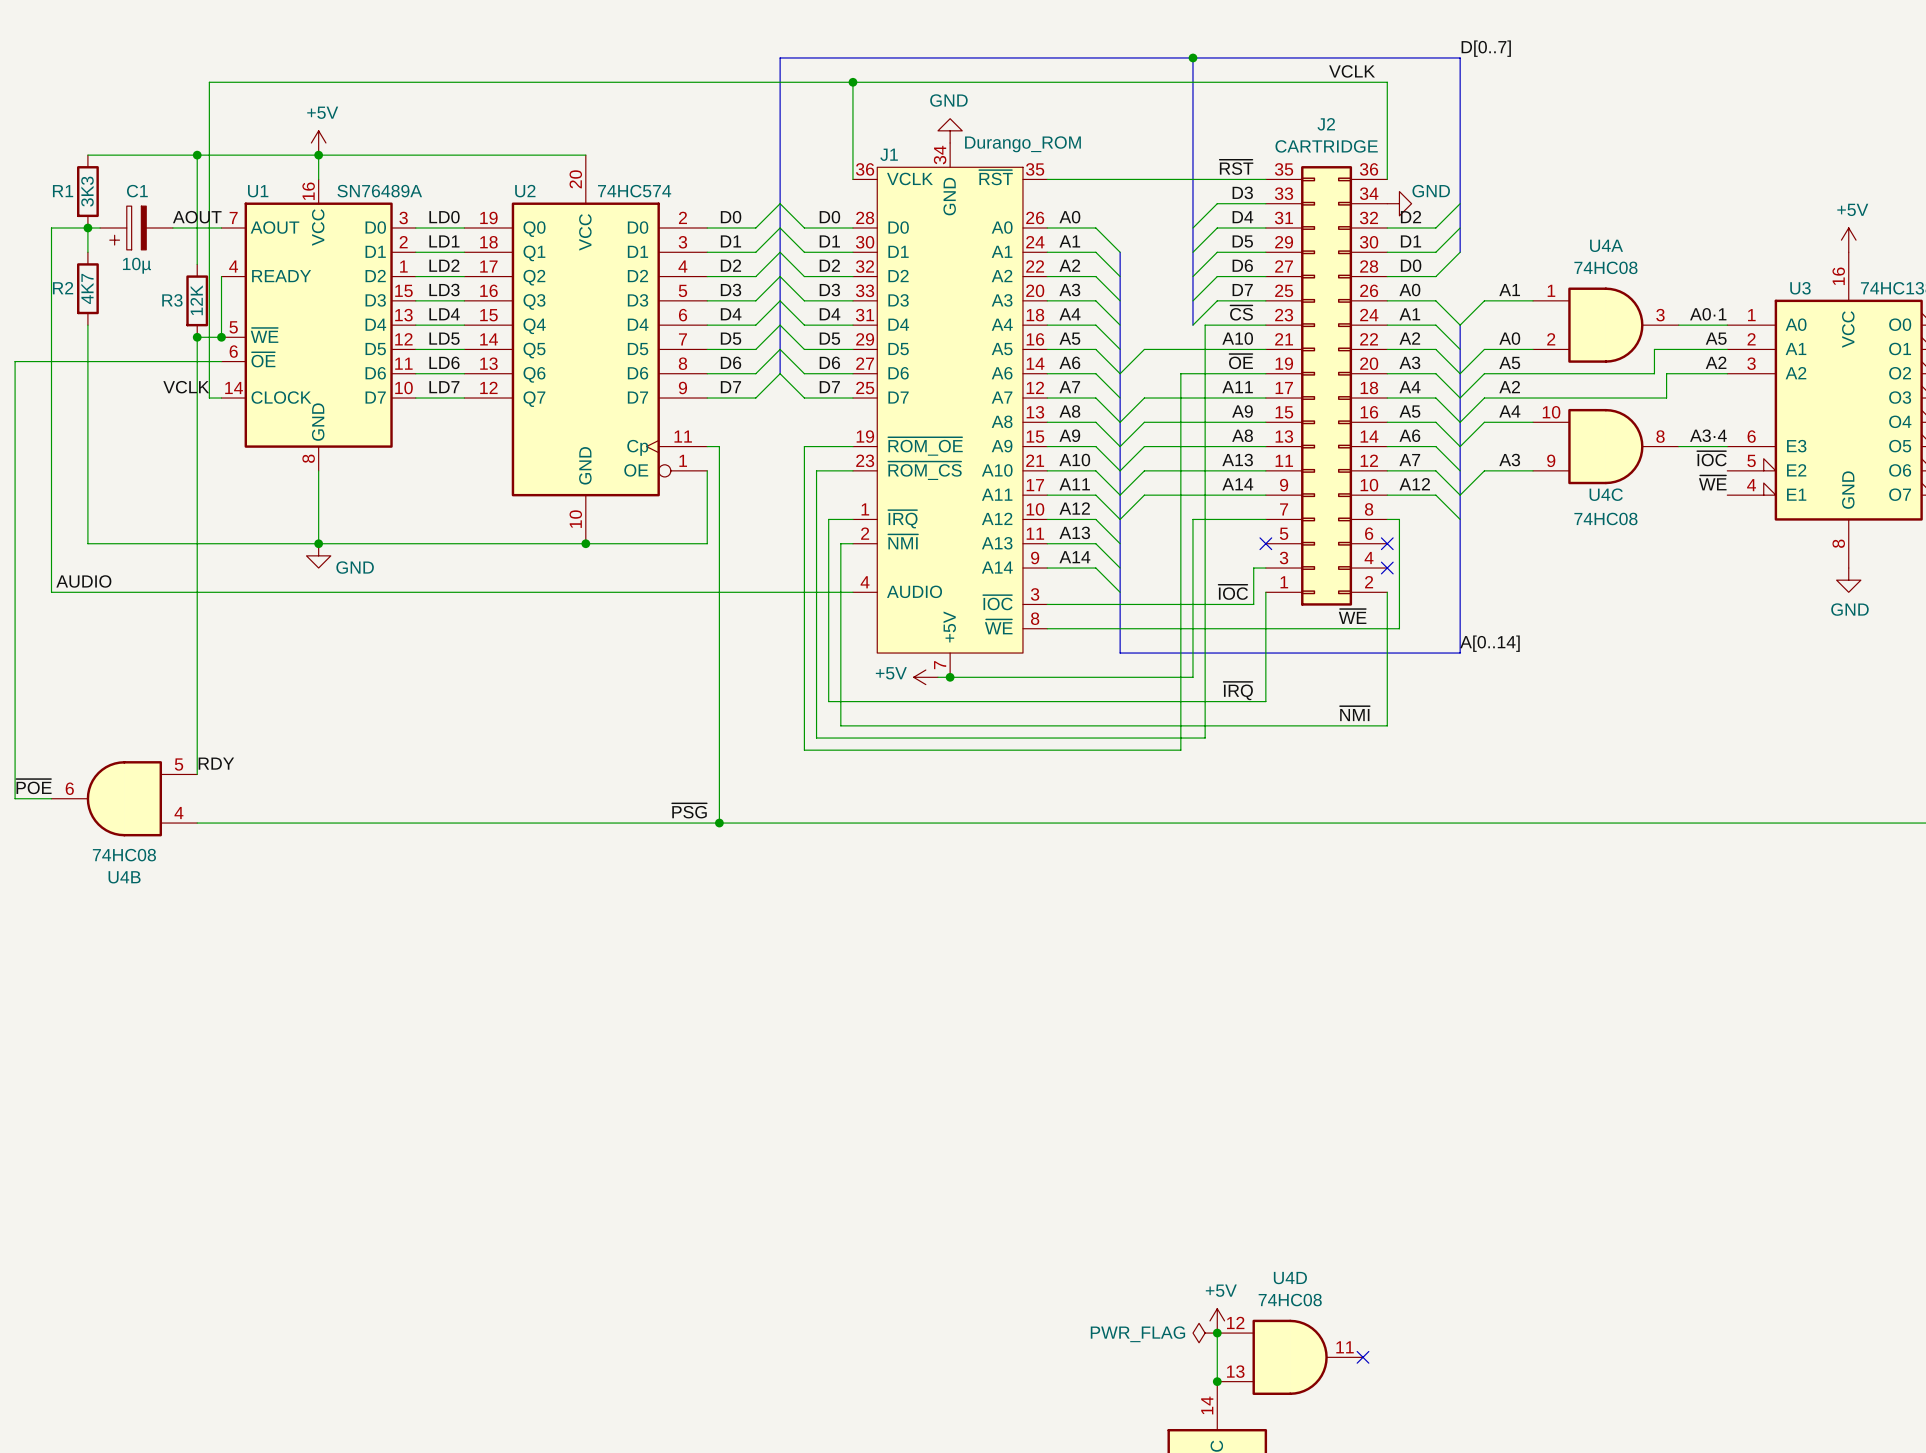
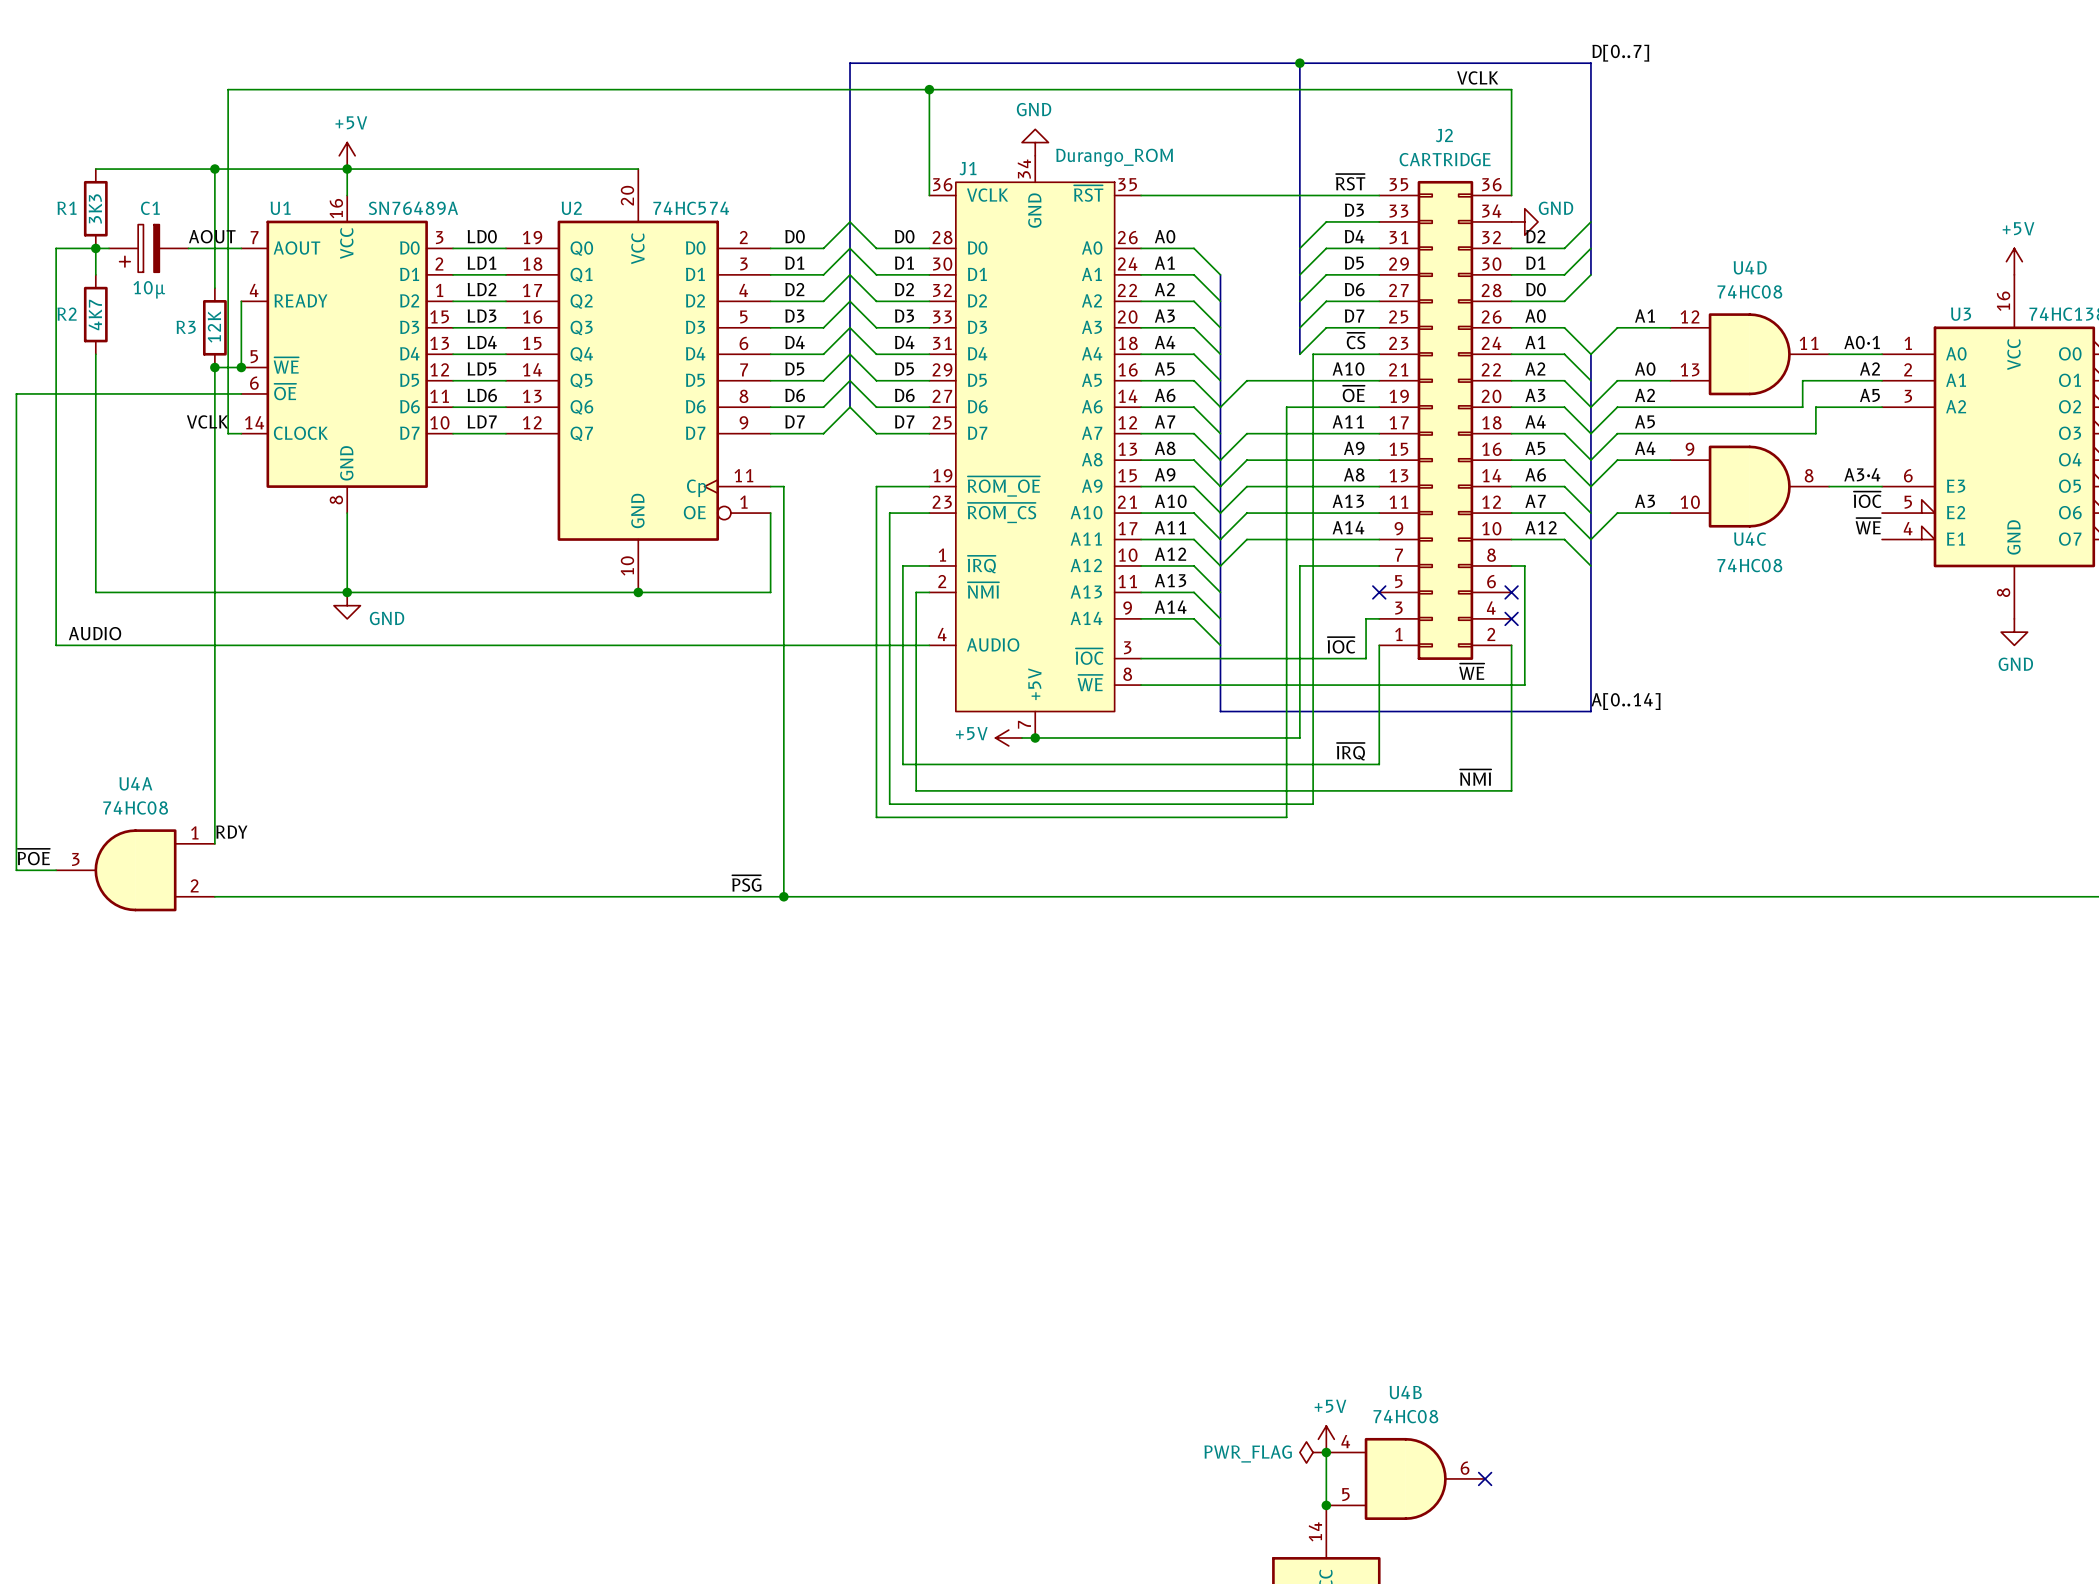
U4A flip: as is (1605, 325) -> left-right (135, 870)
U4A position: (1605, 325) -> (135, 870)
label: A5 (1716, 338) -> A2 (1869, 368)
label: A5 (1509, 362) -> A2 (1645, 395)
label: A2 (1716, 362) -> A5 (1869, 395)
label: A2 (1509, 387) -> A5 (1644, 421)
U4C flip: as is (1605, 446) -> up-down (1749, 486)
U4B rotation: 0° (124, 798) -> 180° (1405, 1478)
U4B position: (124, 798) -> (1405, 1478)
U4D position: (1290, 1357) -> (1749, 354)

